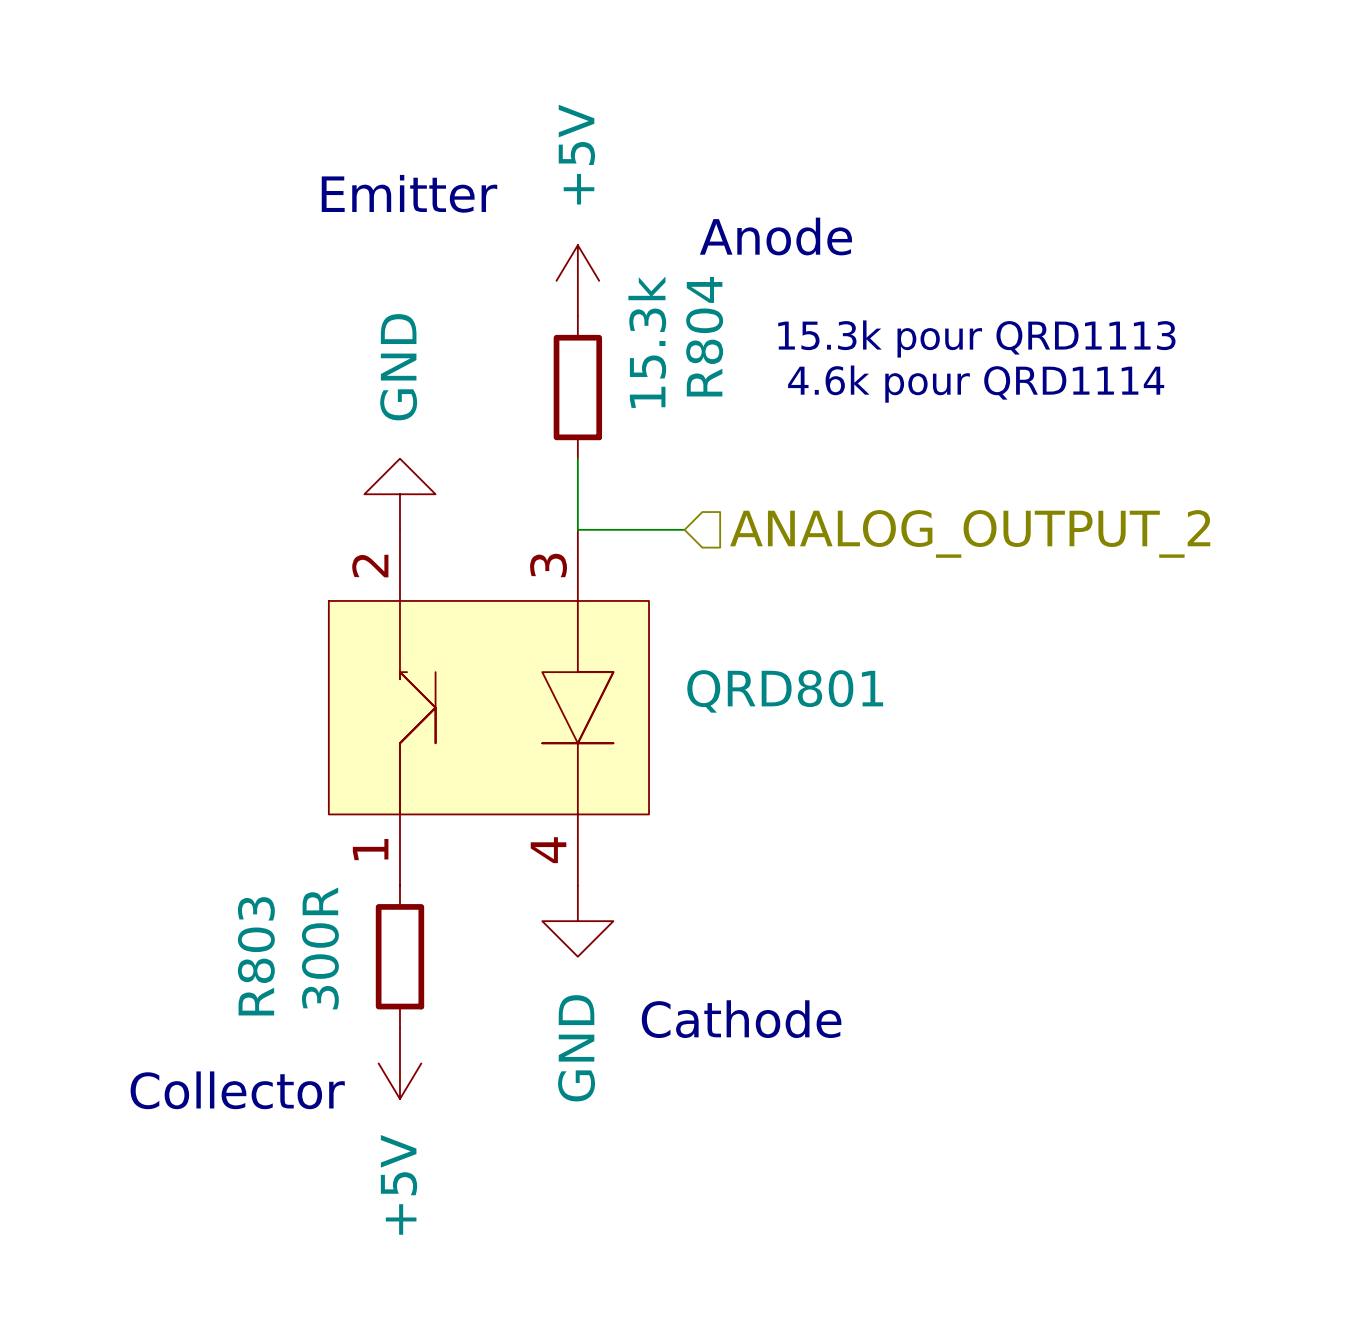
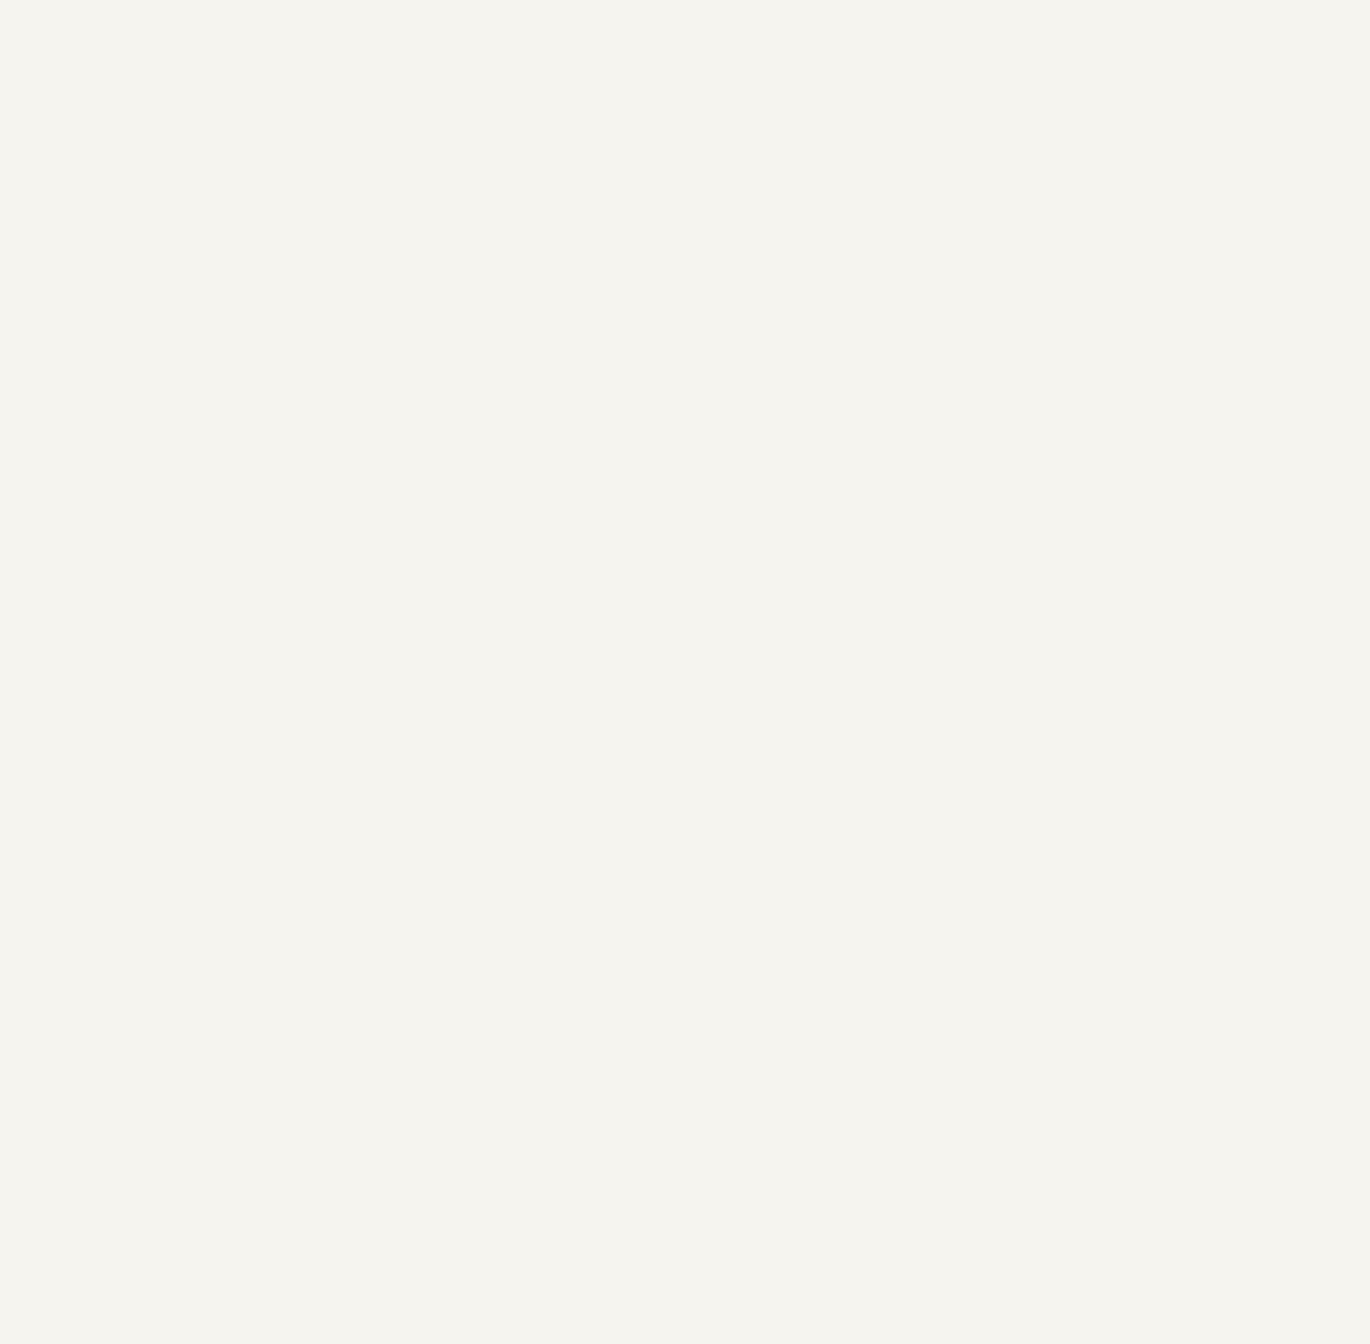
text: Emitter (409, 193) -> none
text: Anode (775, 236) -> none
power symbol: +5V (577, 280) -> none
text: 15.3k pour QRD1113 (976, 338) -> none
text: 4.6k pour QRD1114 (976, 384) -> none
R804: 15.3k (577, 387) -> none
wire: (577, 458) (577, 529) (684, 529) -> none
power symbol: GND (399, 494) -> none
hierarchical label: ANALOG_OUTPUT_2 (970, 533) -> none
QRD801: (488, 707) -> none
power symbol: GND (577, 921) -> none
R803: 300R (399, 956) -> none
text: Cathode (741, 1019) -> none
power symbol: +5V (399, 1063) -> none
text: Collector (237, 1090) -> none

